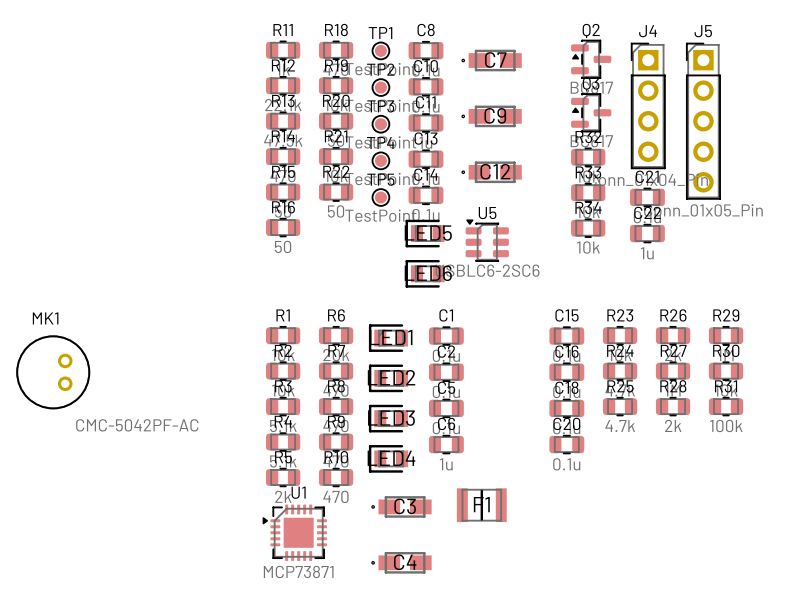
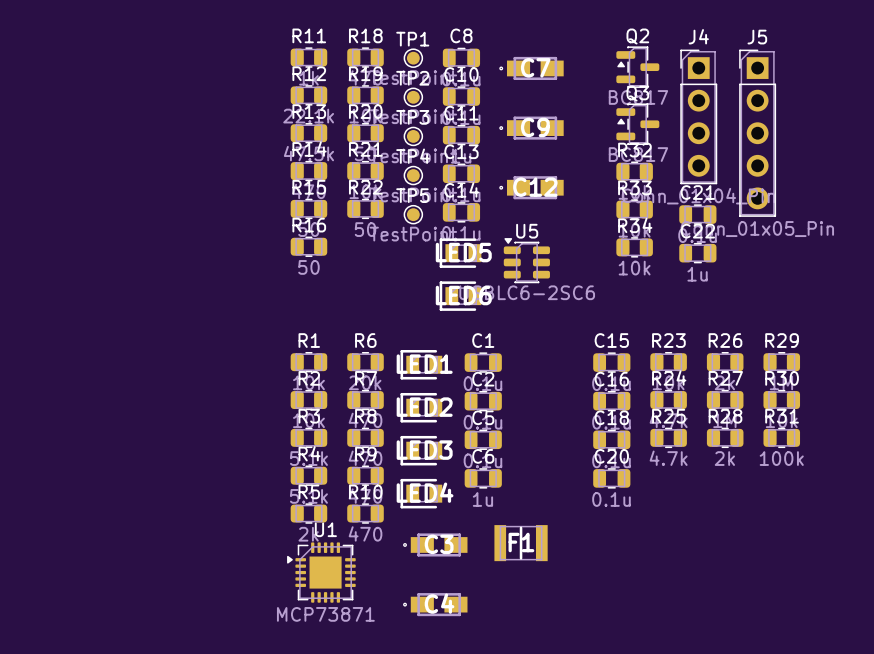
MK1: CMC-5042PF-AC (53, 372) -> none

